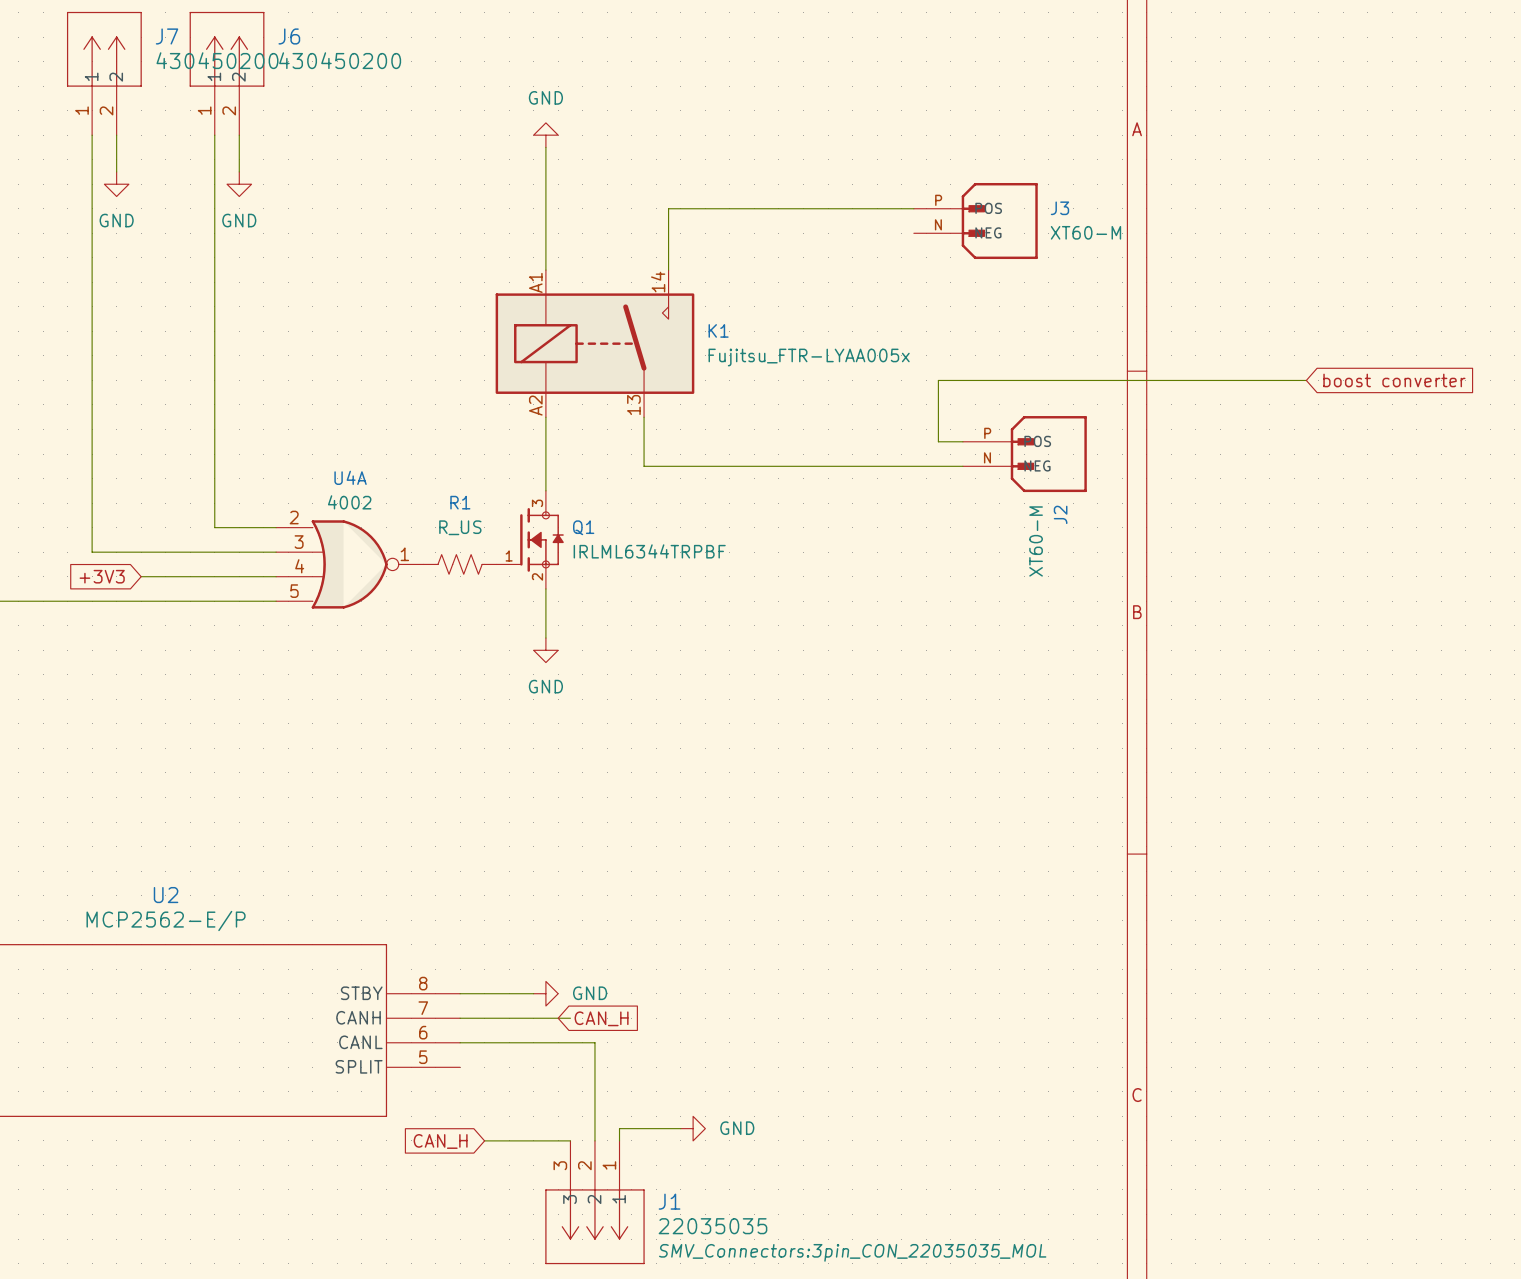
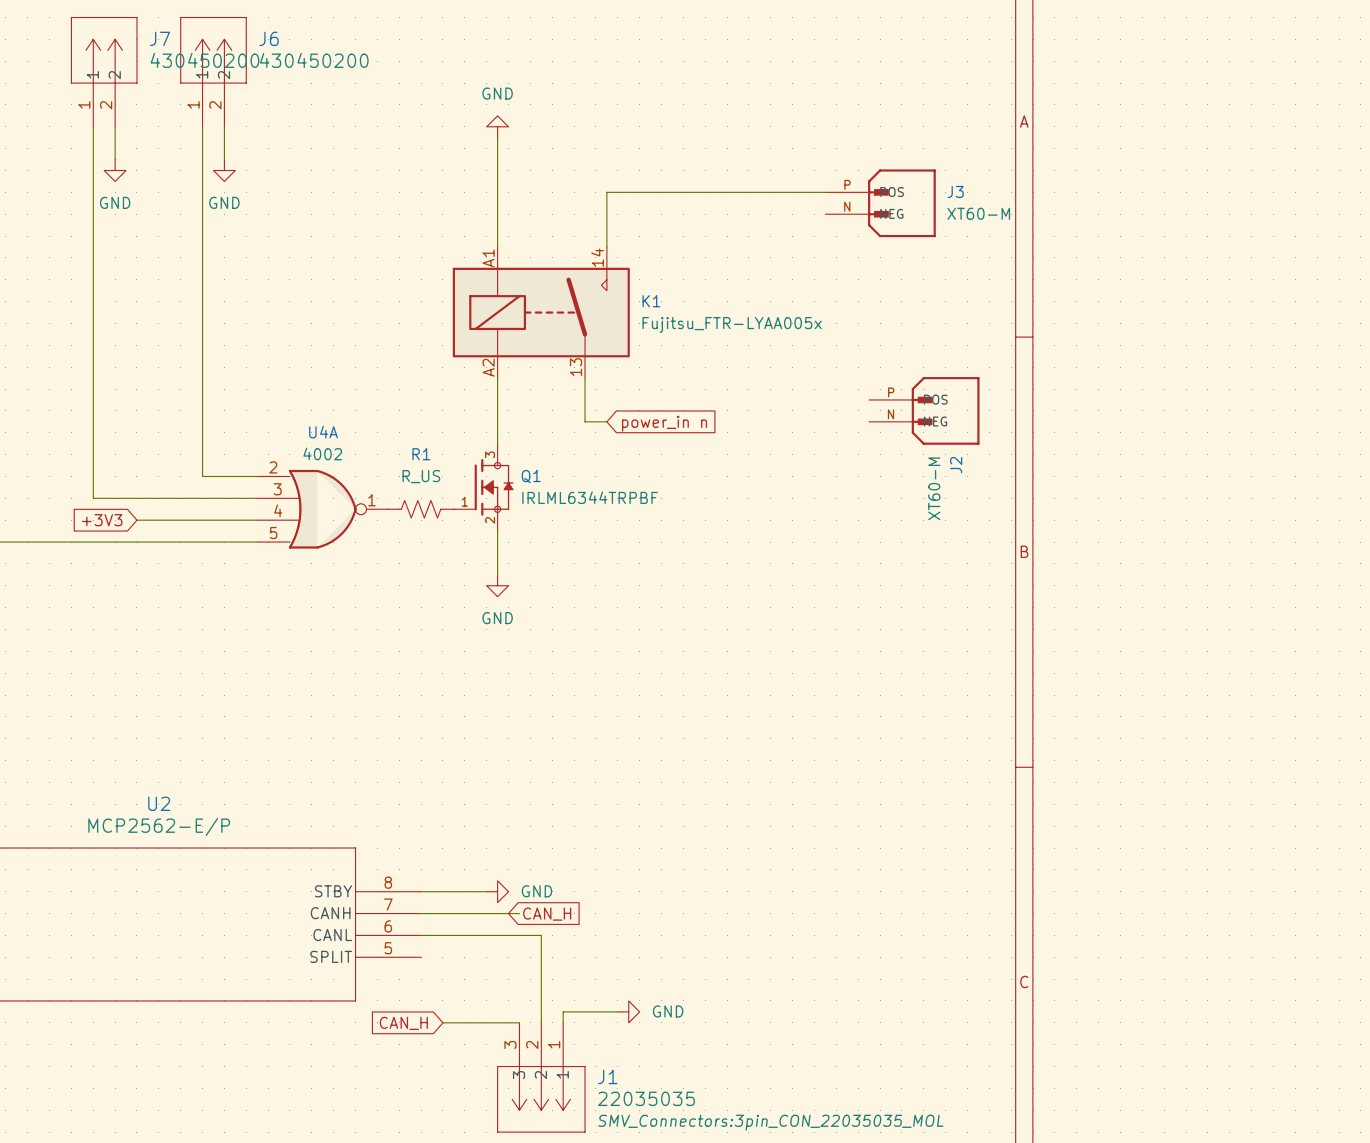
wire: (1306, 380) (938, 380) (938, 441) (962, 441) -> none
global label: boost converter (1394, 380) -> none
wire: (668, 466) (962, 466) -> none
global label: none -> power_in n (664, 423)

